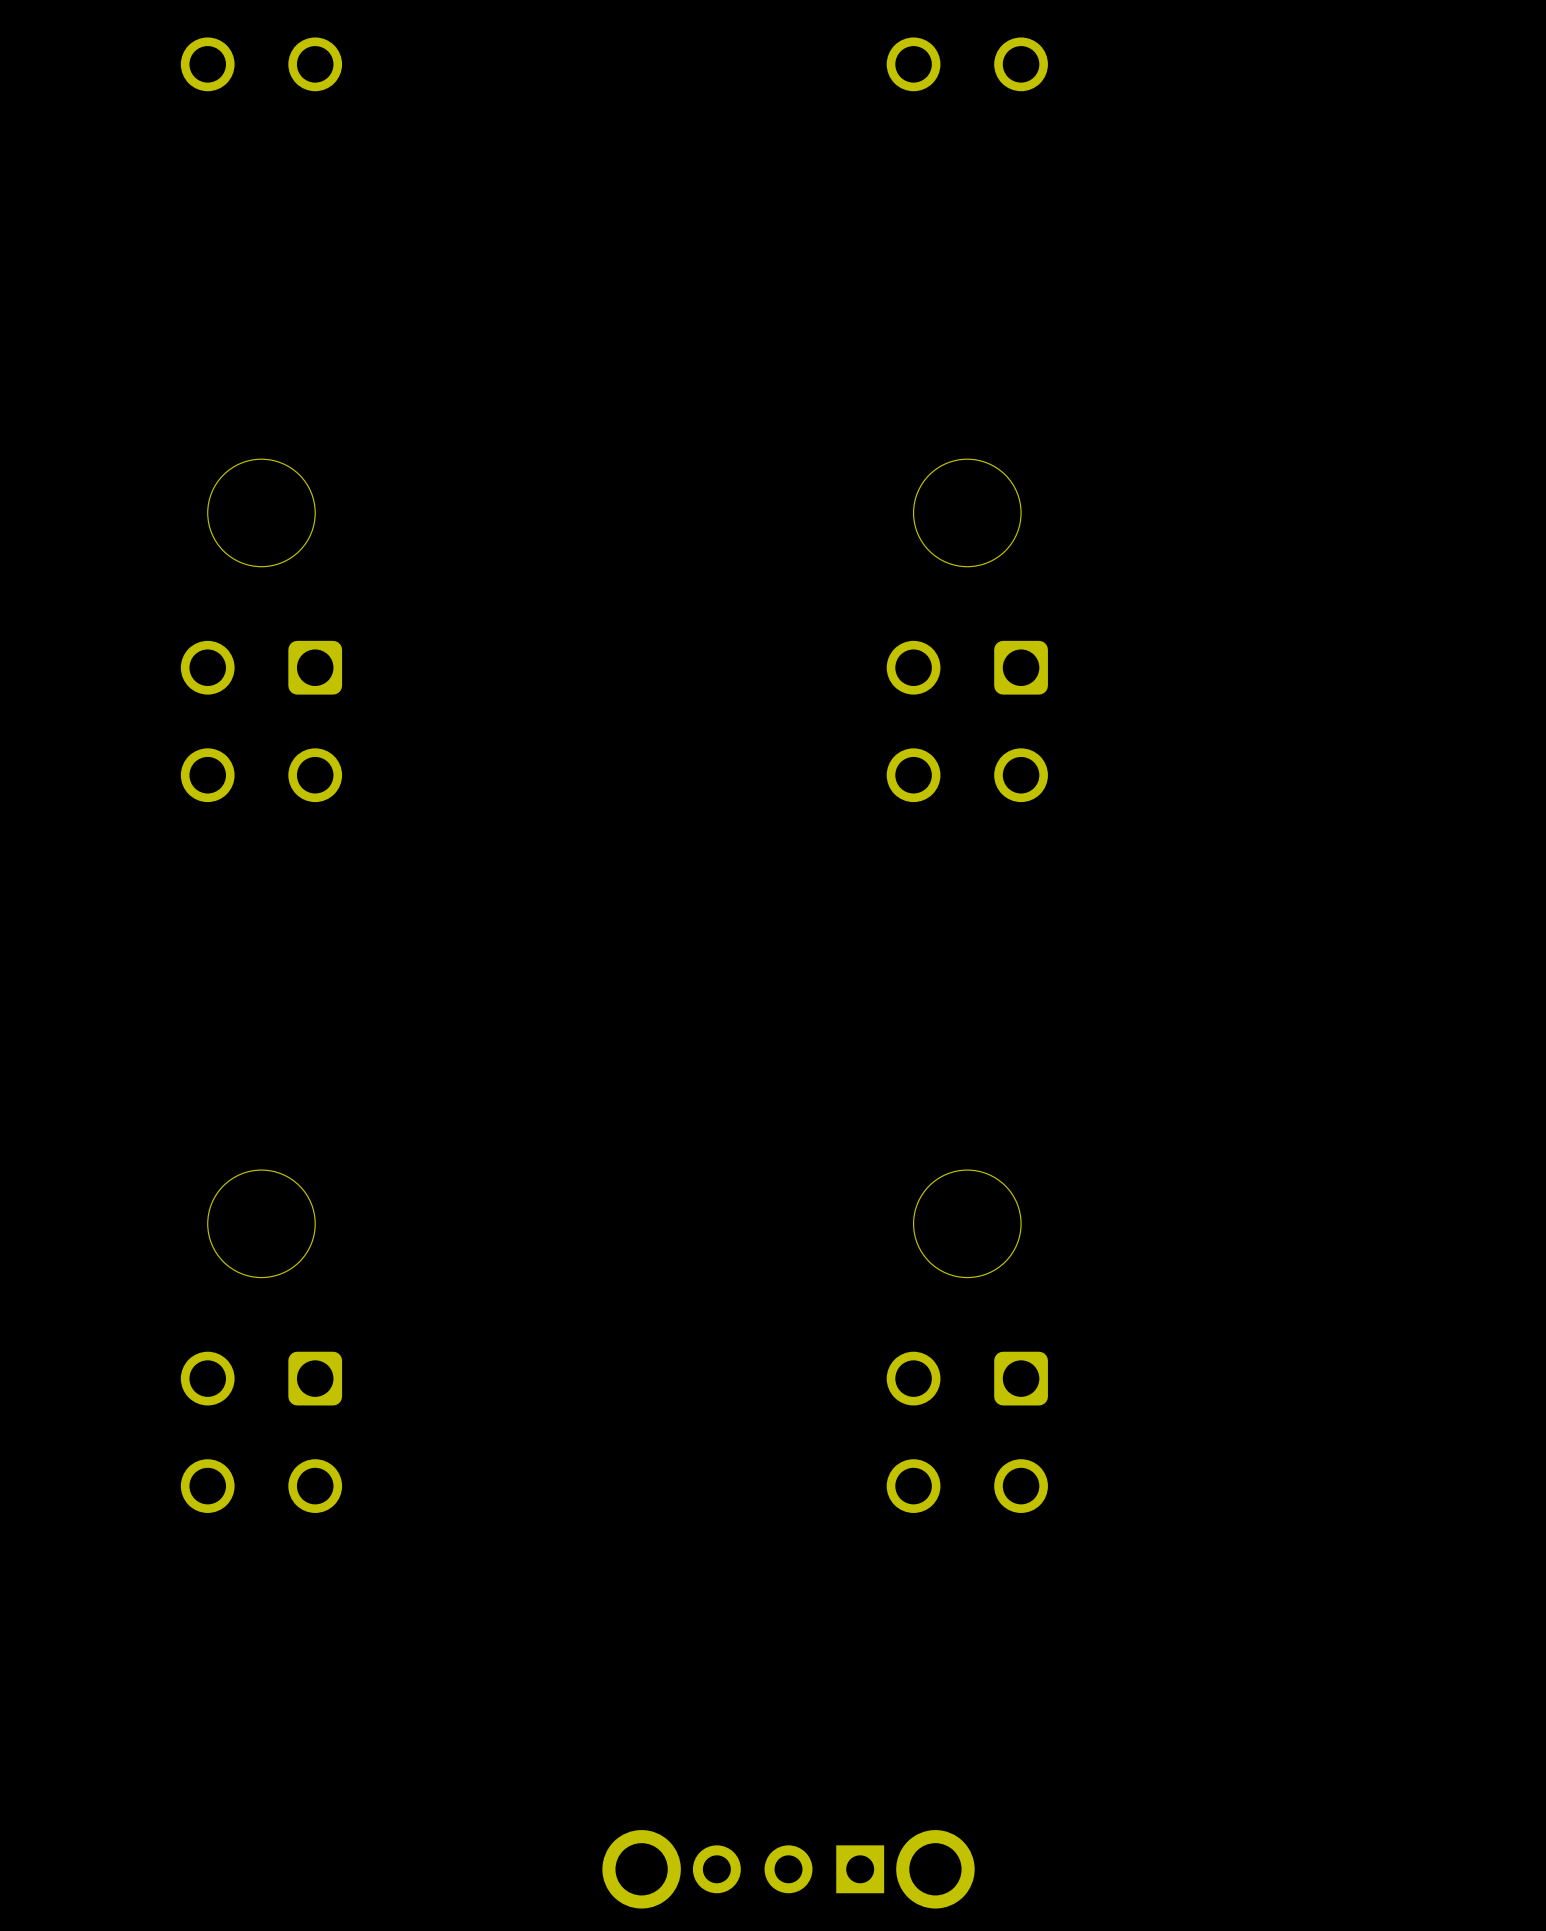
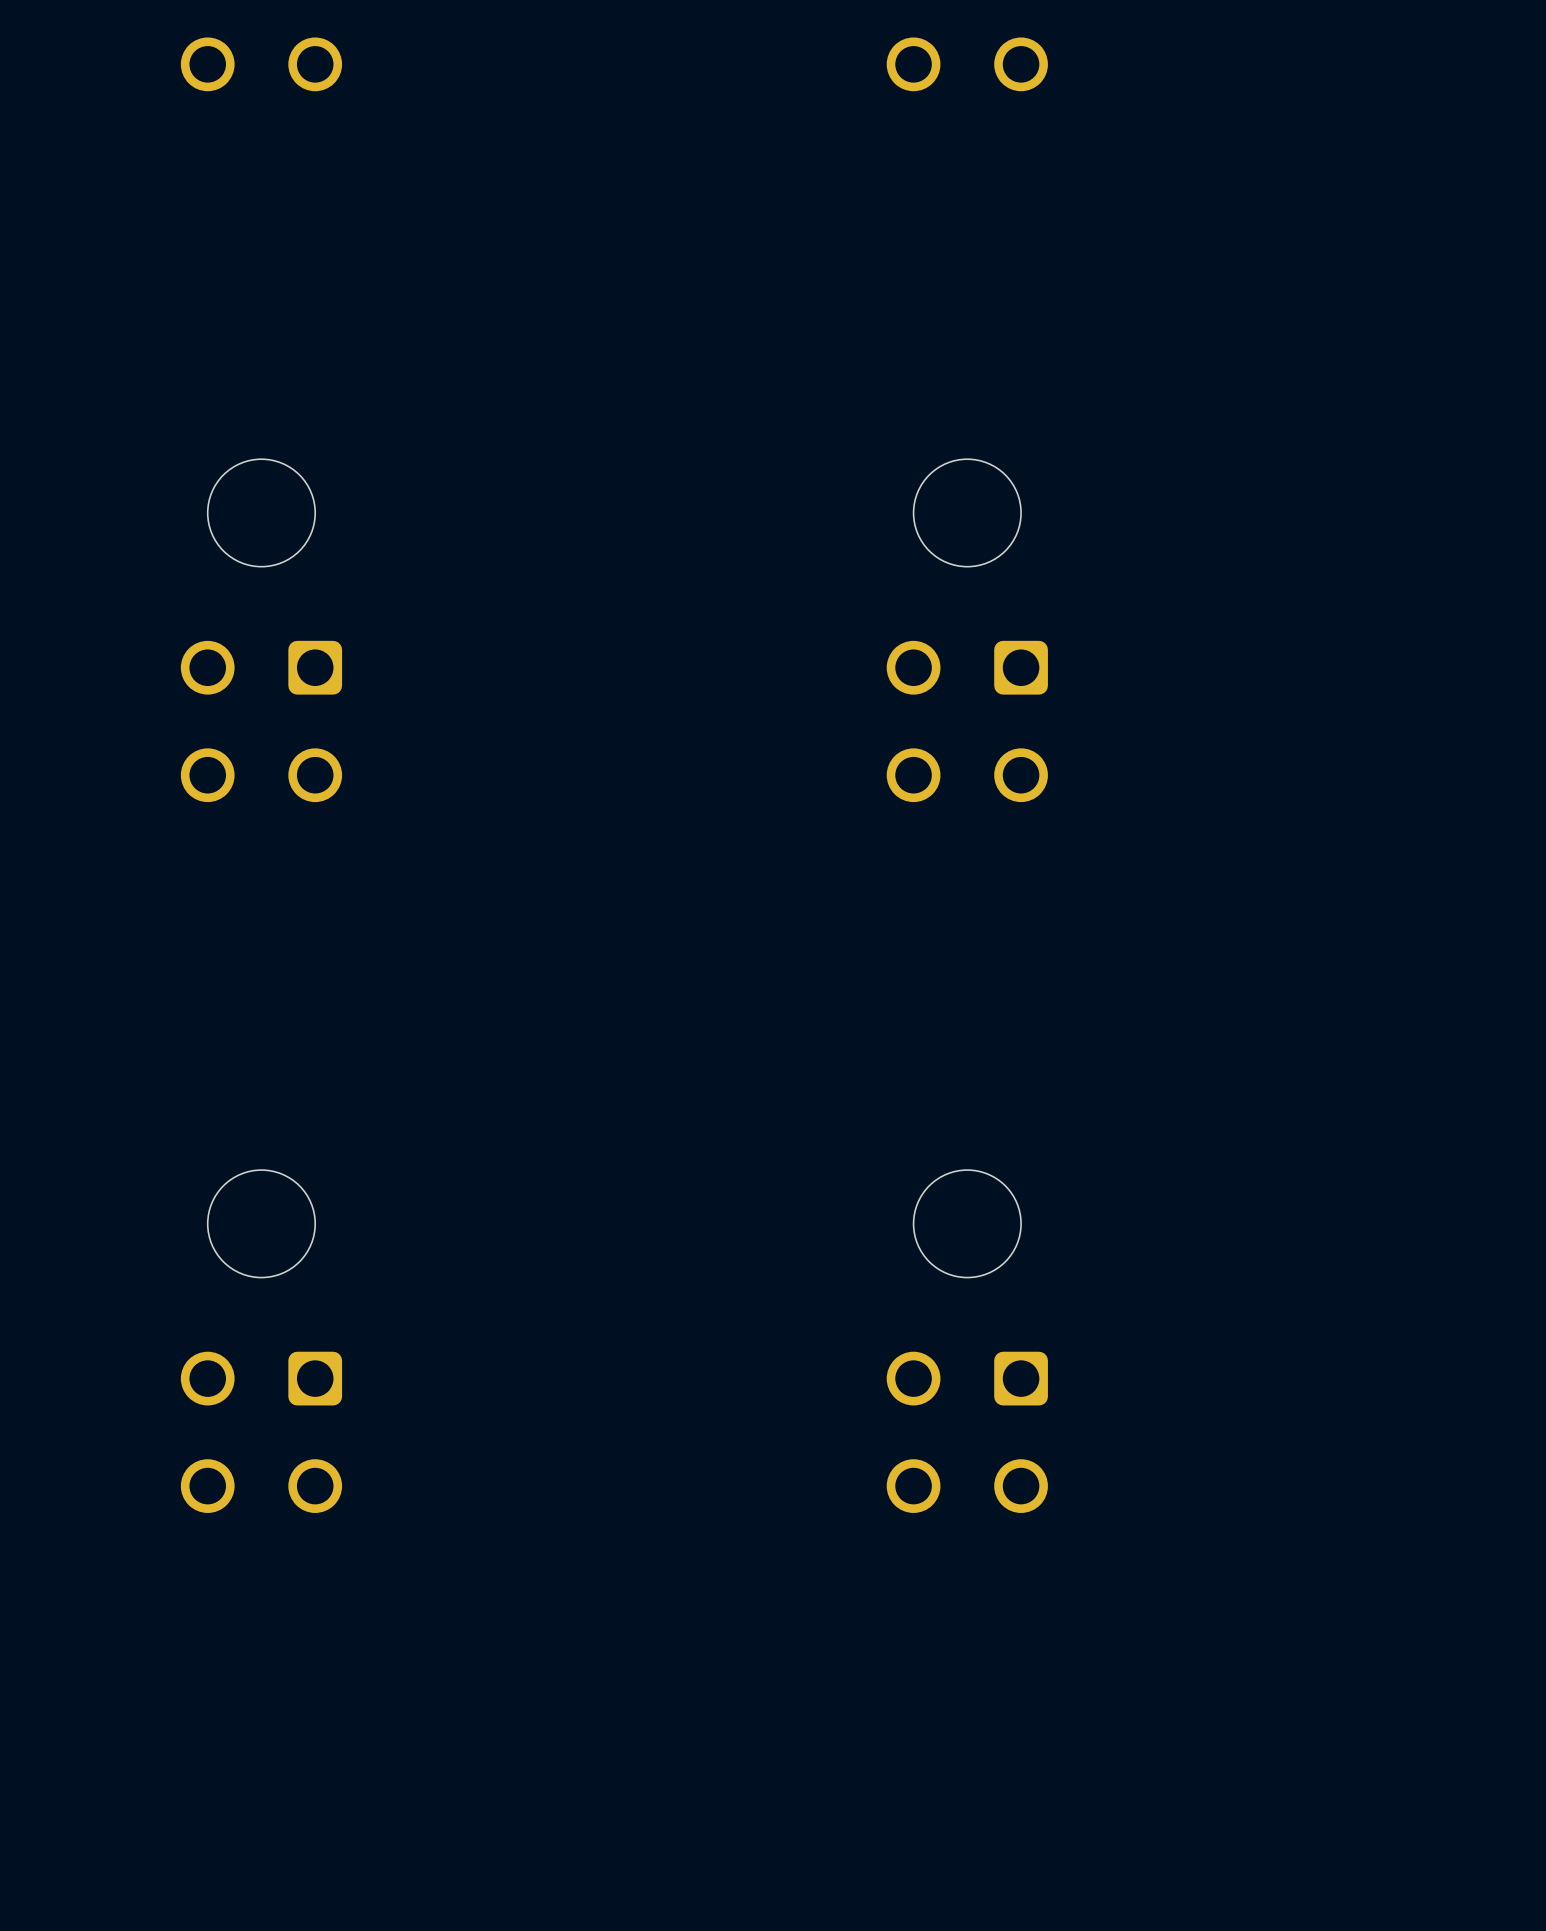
part: (788, 1869) -> none

